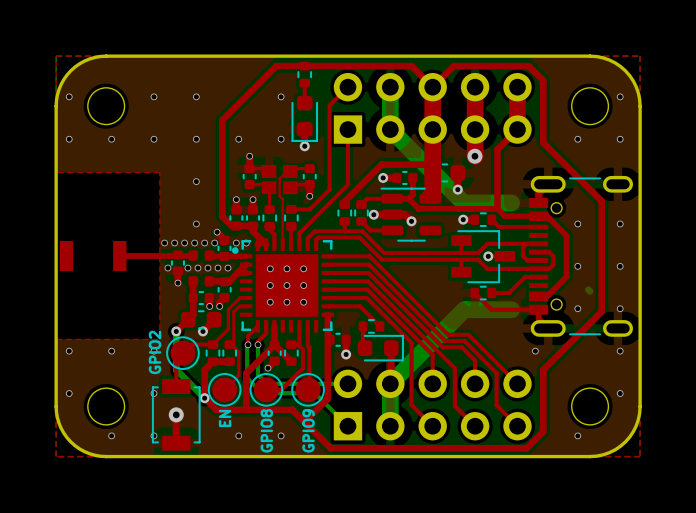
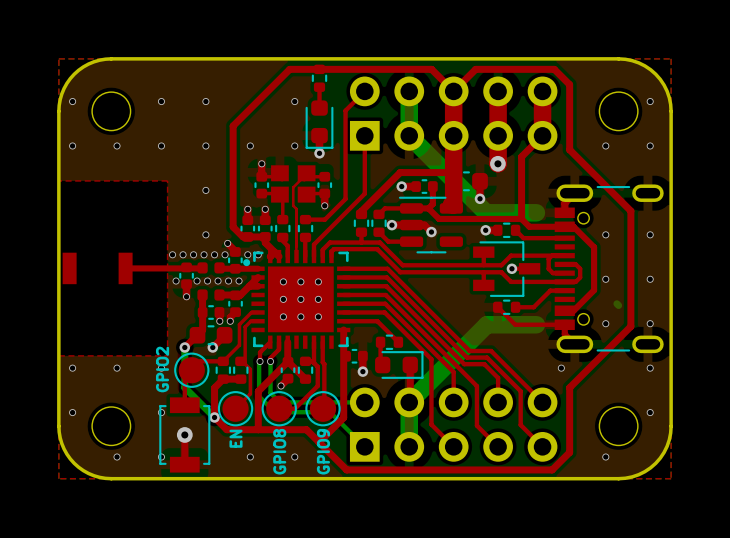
part footprint: [261, 165, 298, 195] -> [271, 165, 316, 203]

